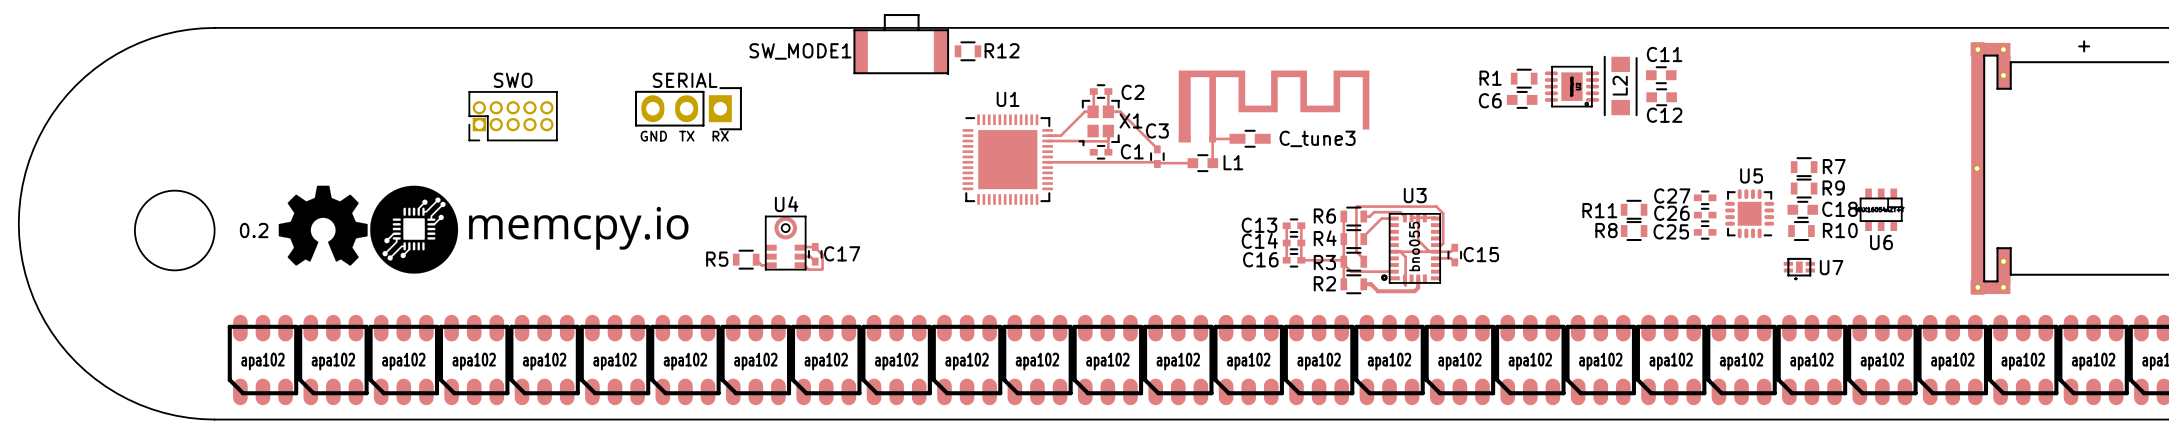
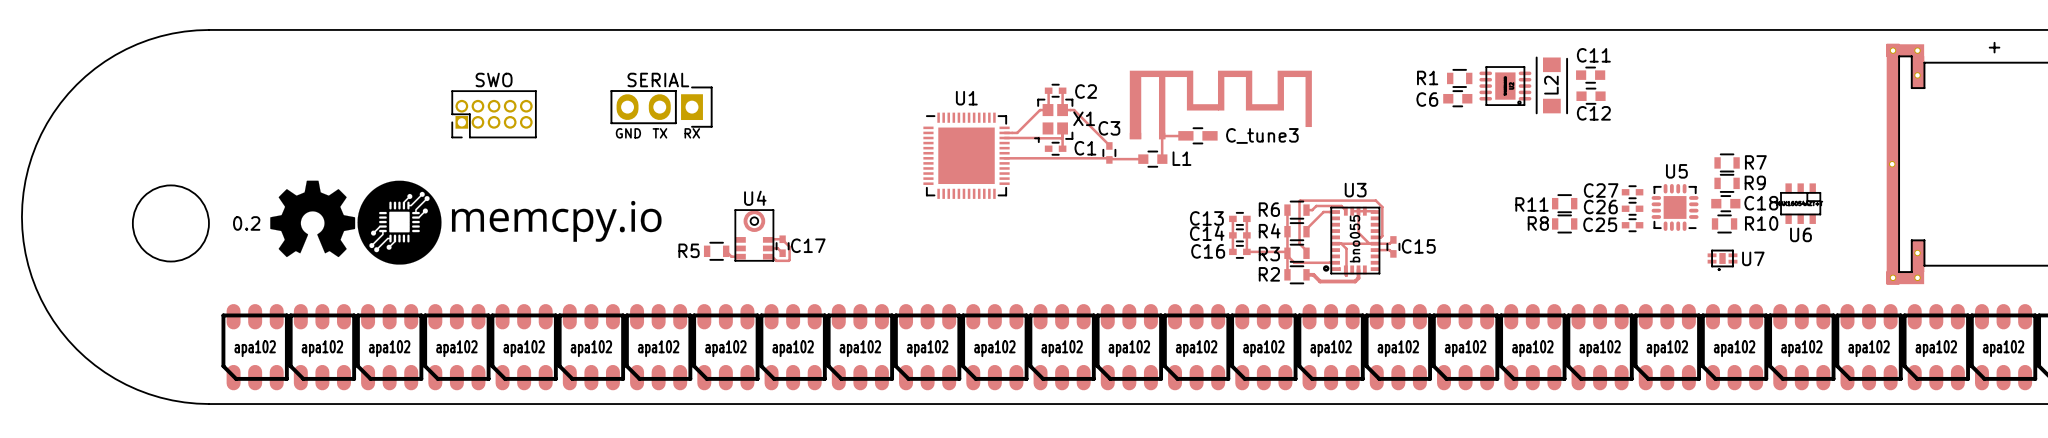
SW_MODE1: (901, 44) -> none
R12: (967, 51) -> none

